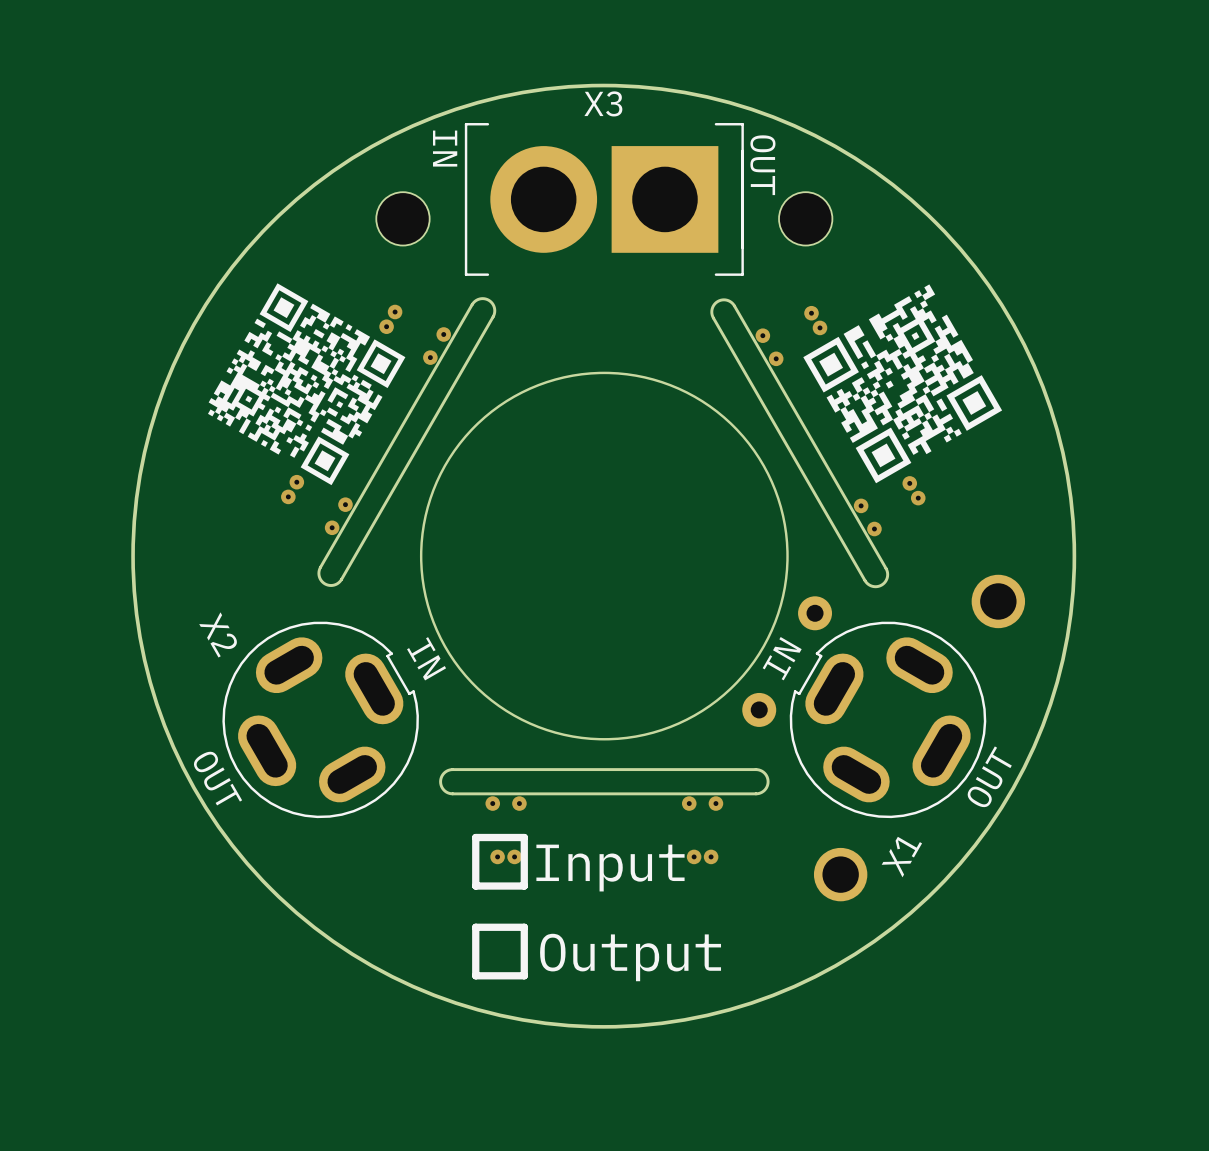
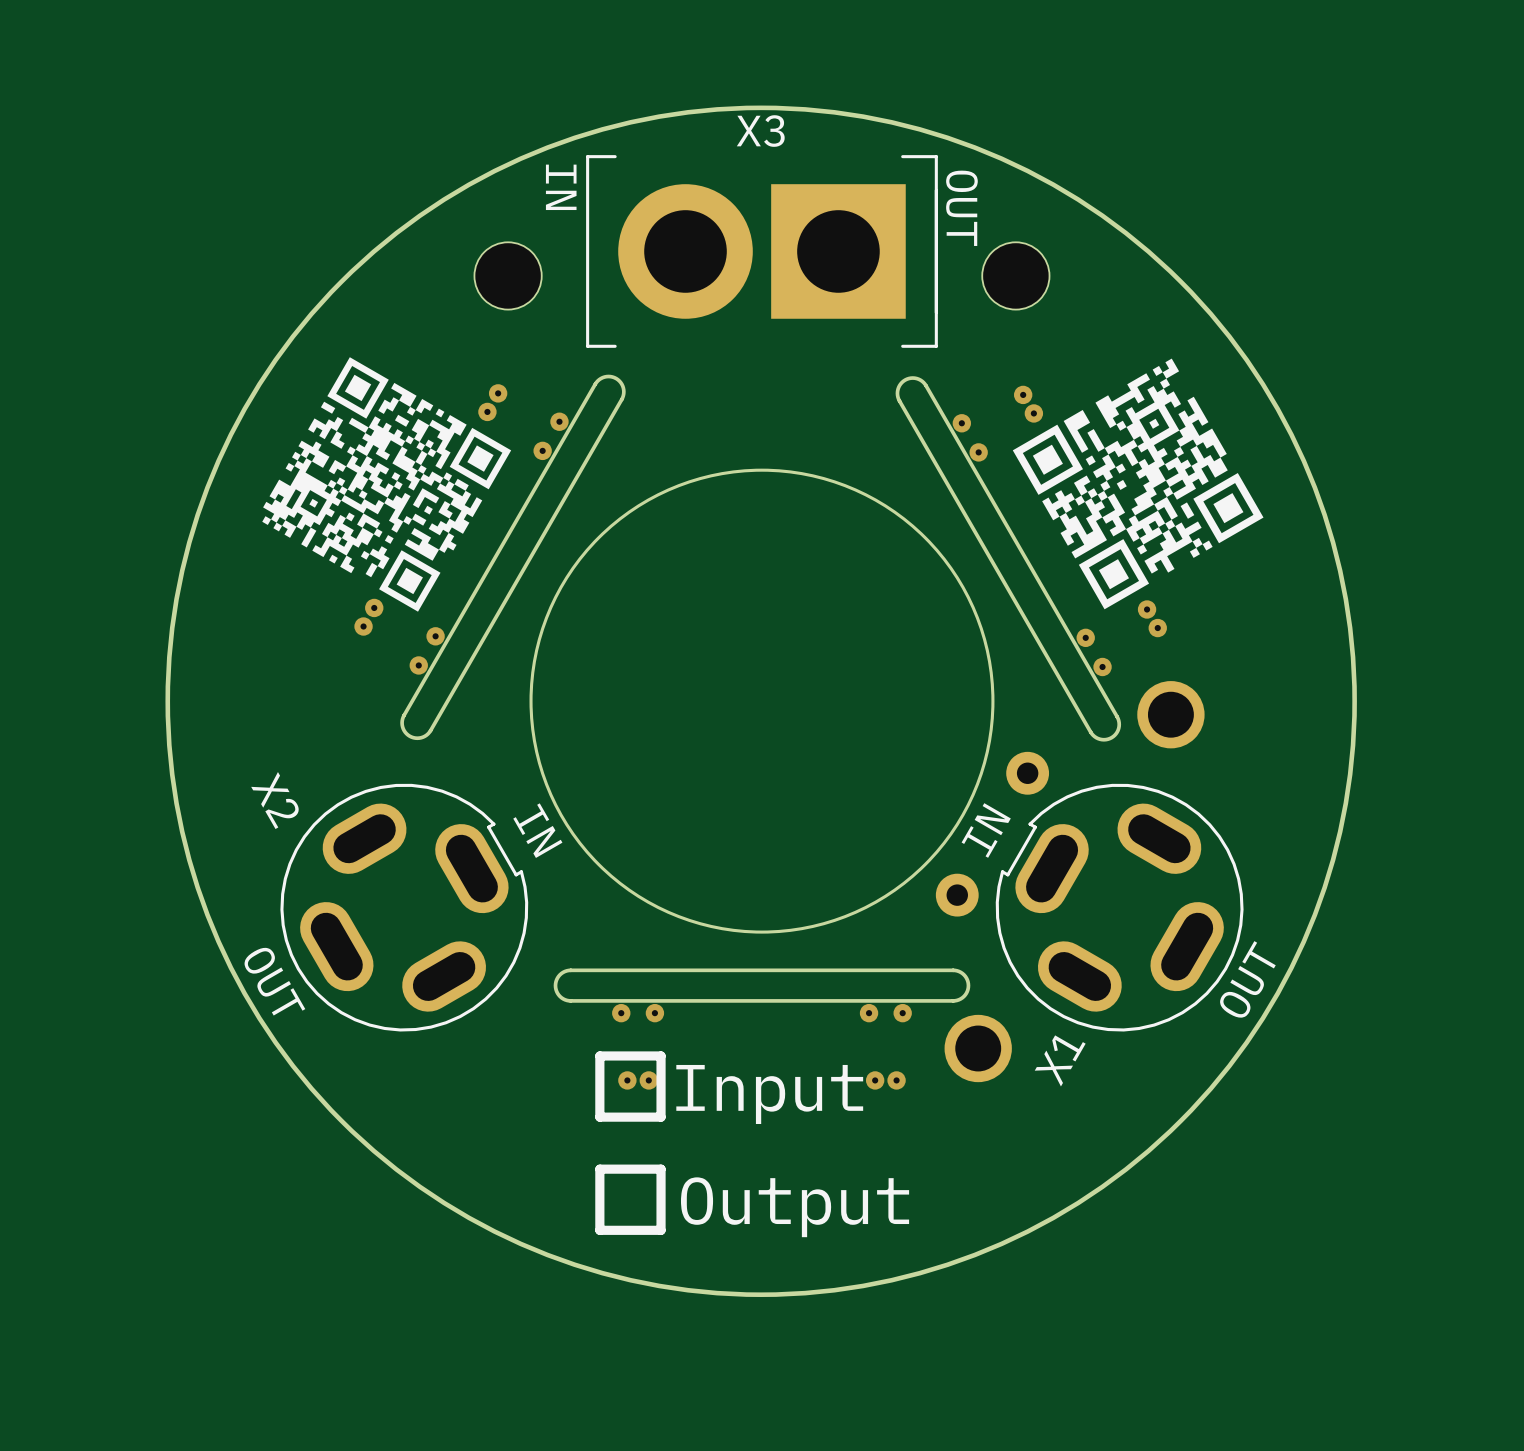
part position: (998, 601) -> (1170, 714)
X1 name position: X1 (901, 857) -> X1 (1060, 1060)
part position: (840, 874) -> (978, 1048)

